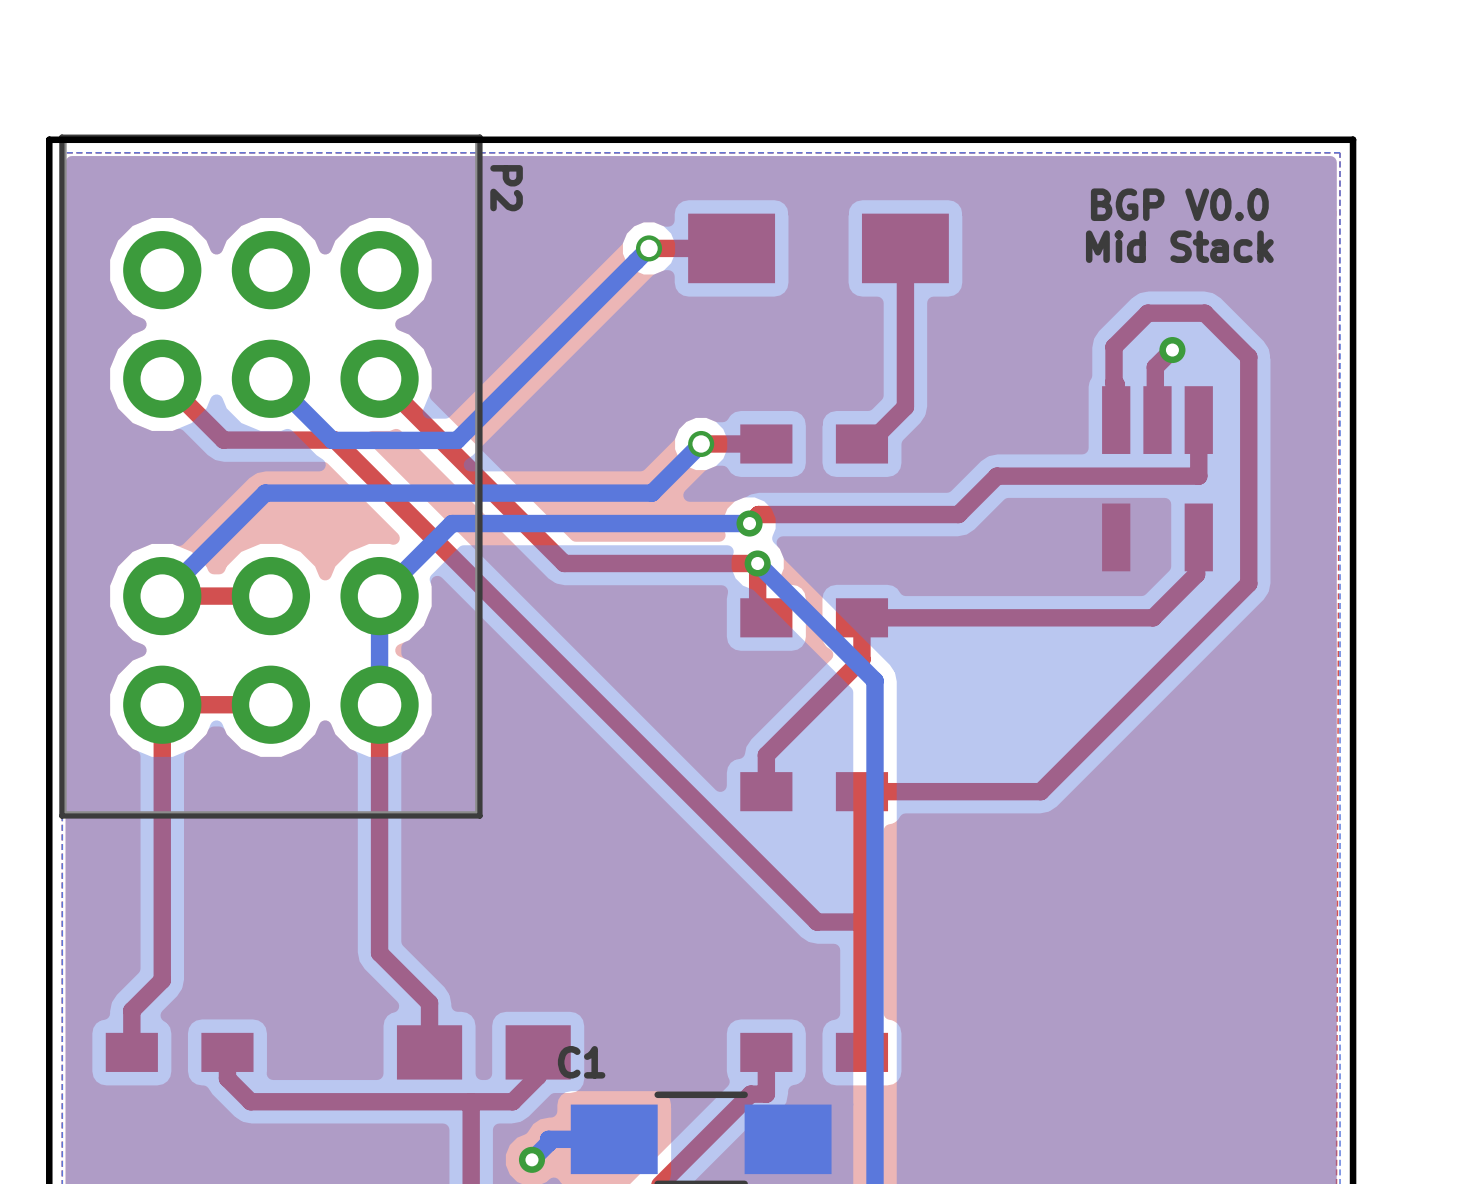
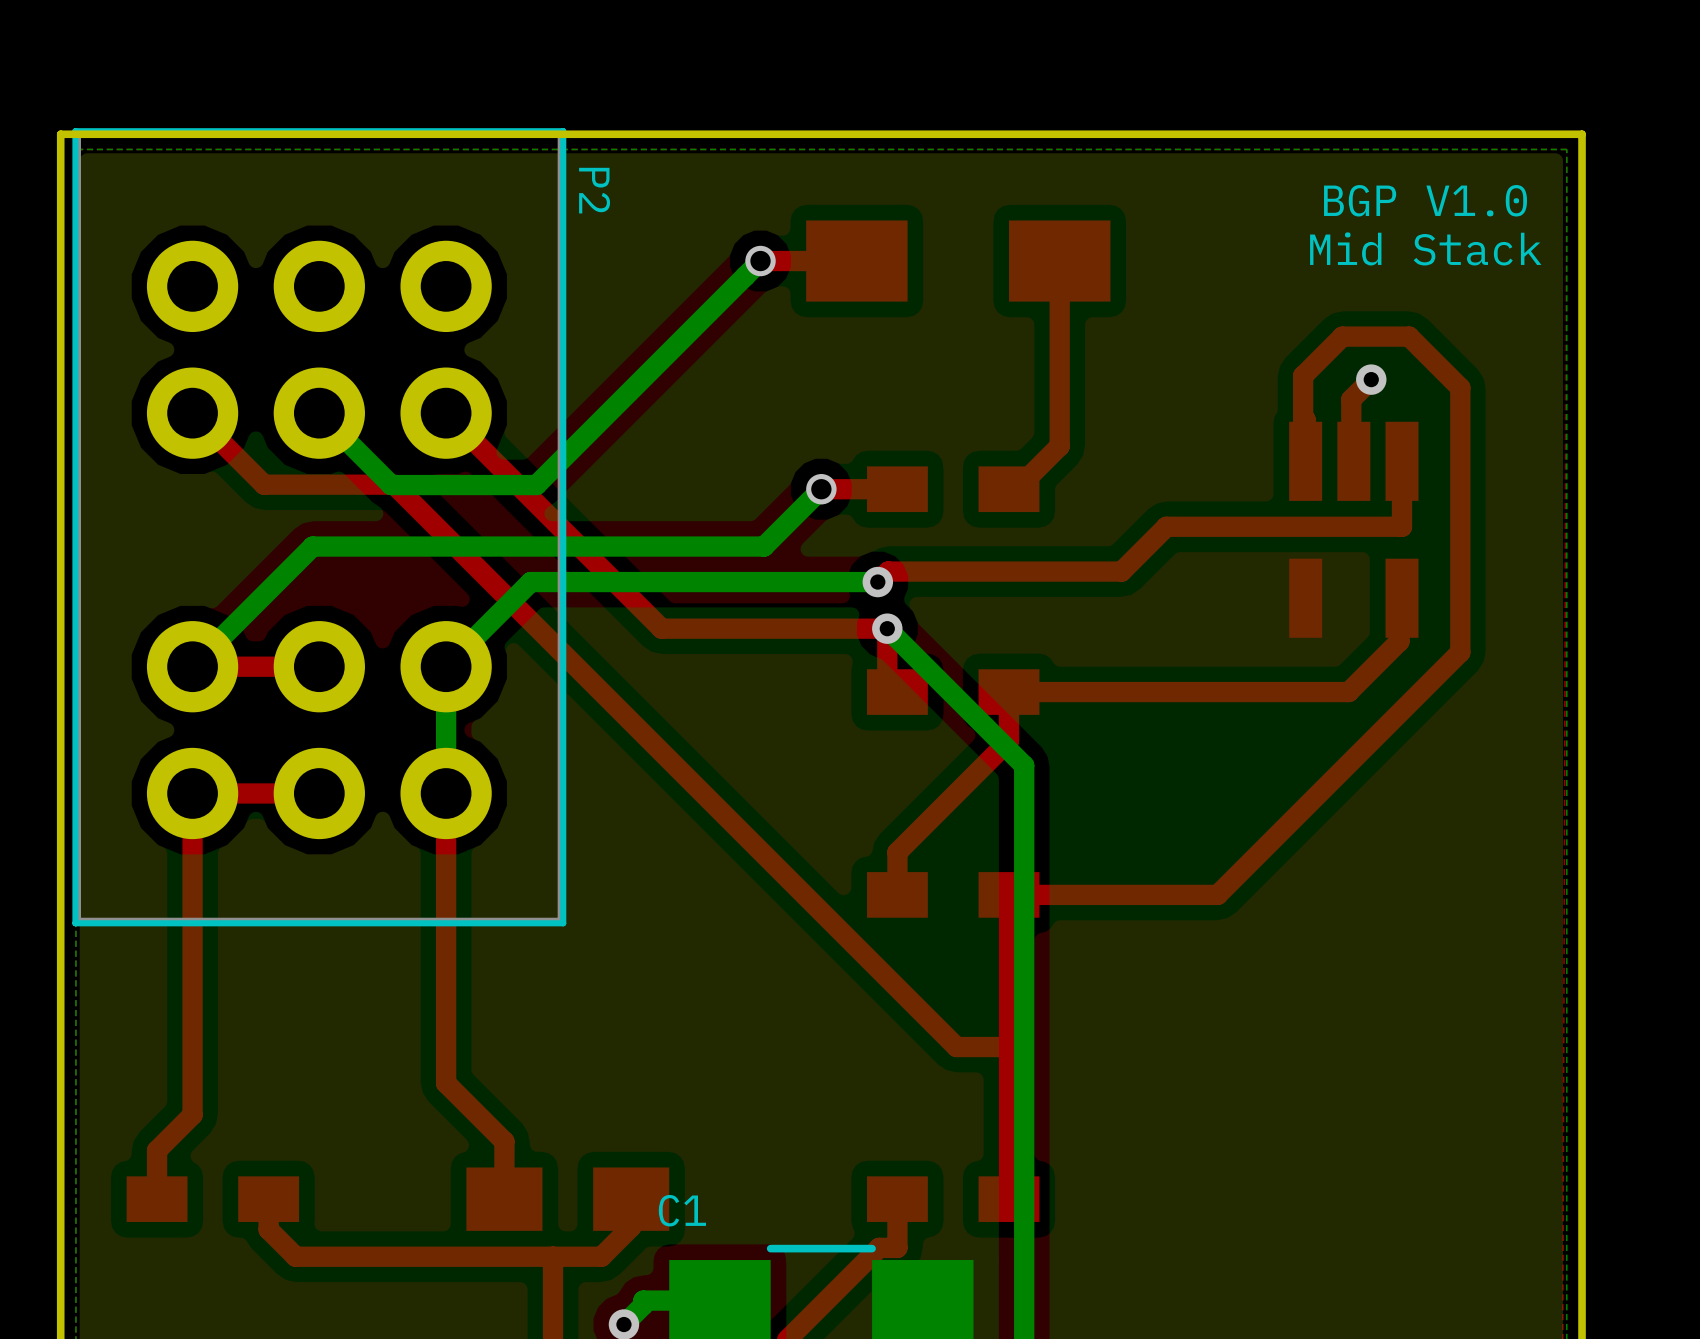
text: BGP V0.0 (1179, 204) -> BGP V1.0 (1425, 200)
text position: Mid Stack (1179, 246) -> Mid Stack (1425, 248)

